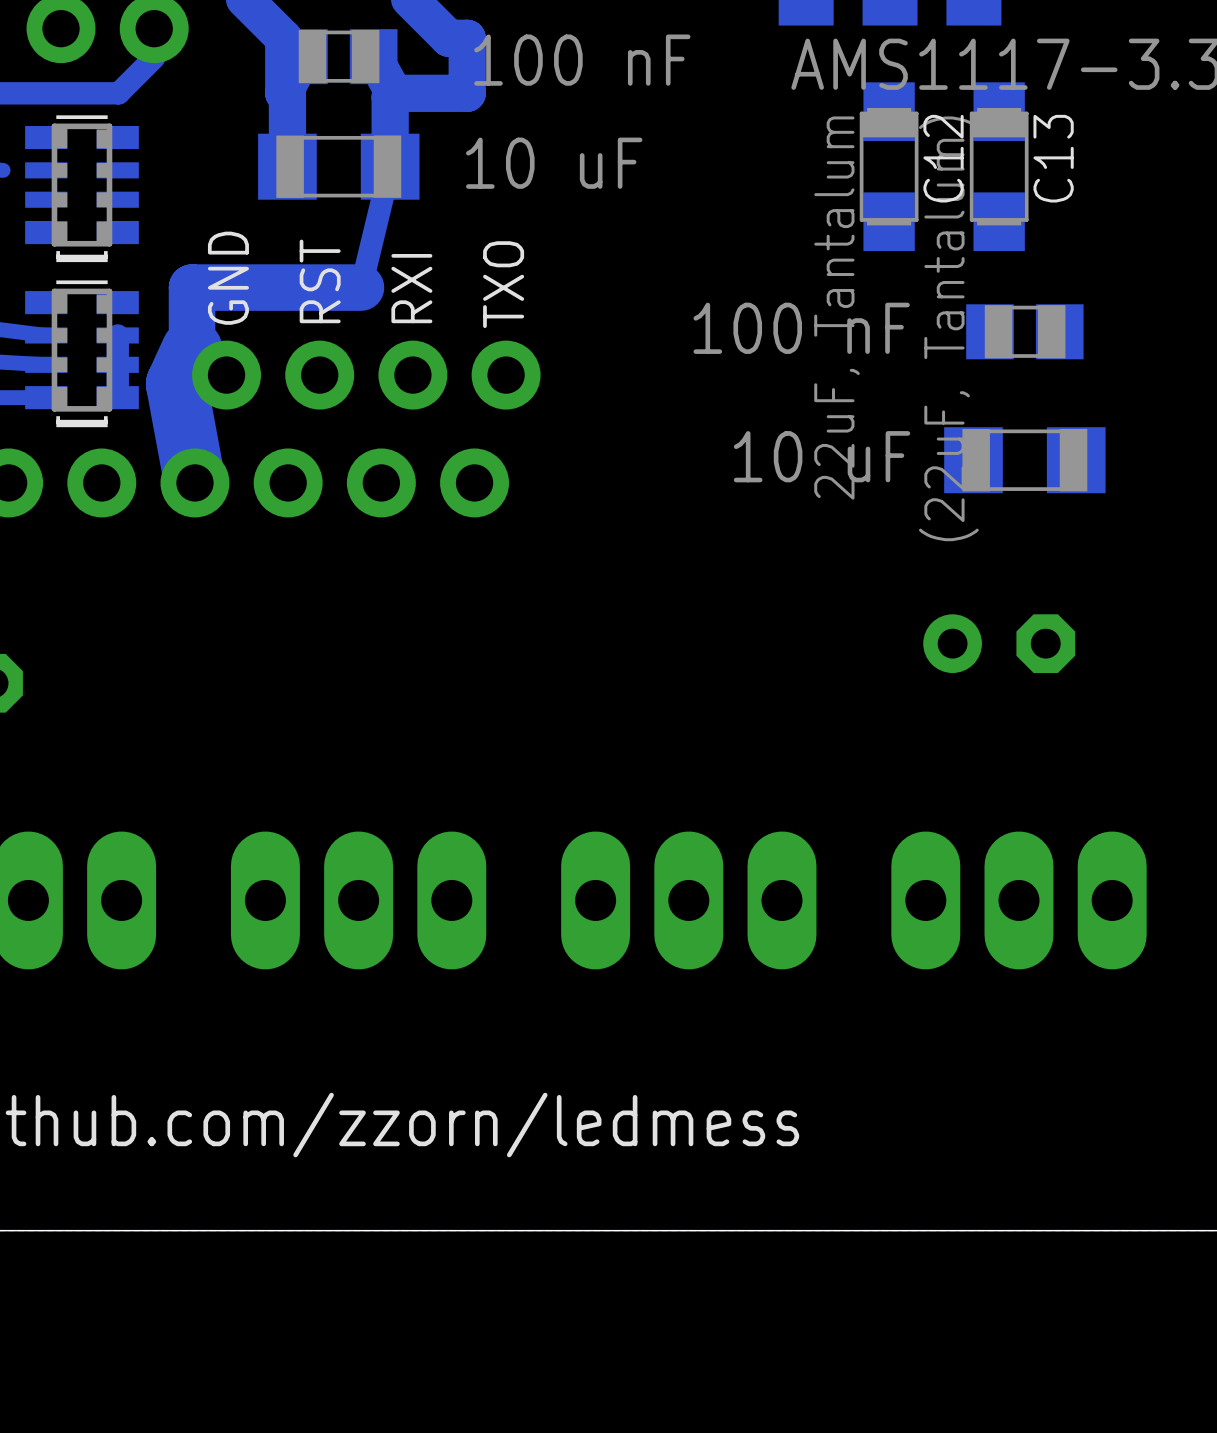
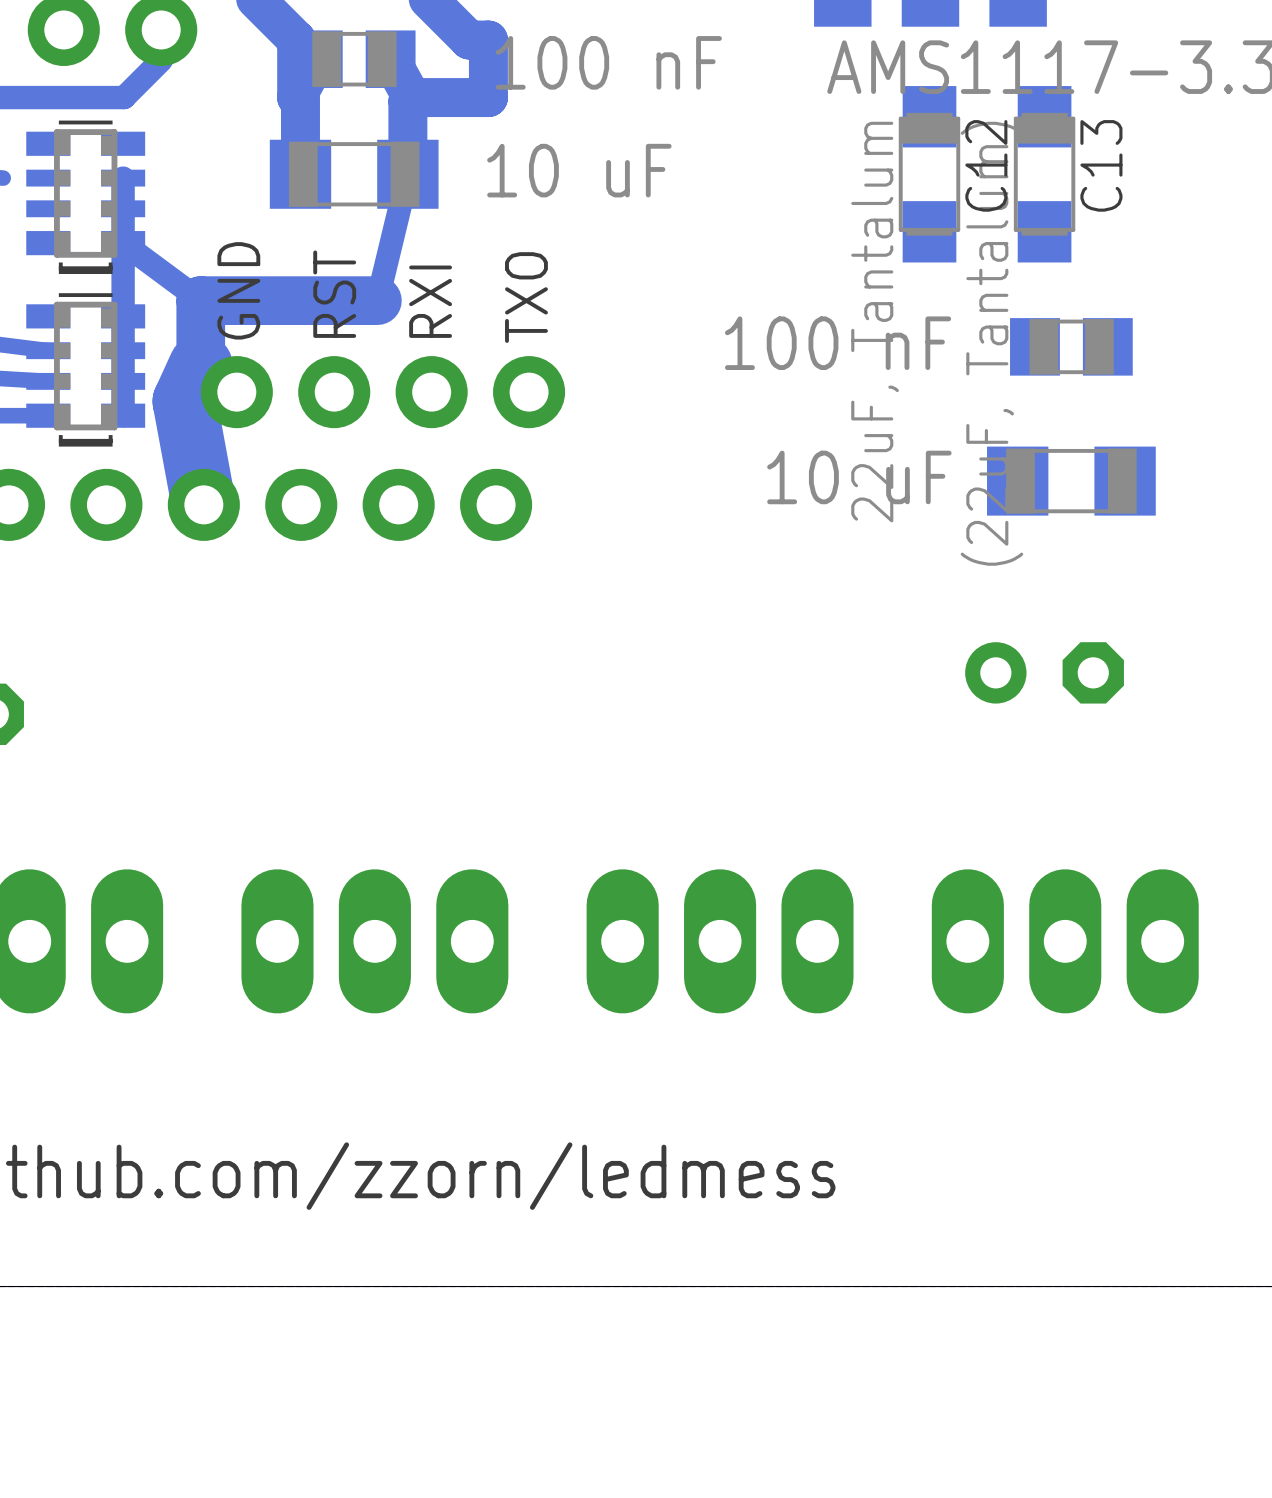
track: none -> (123, 178) (123, 350)
track: none -> (123, 243) (200, 300)

